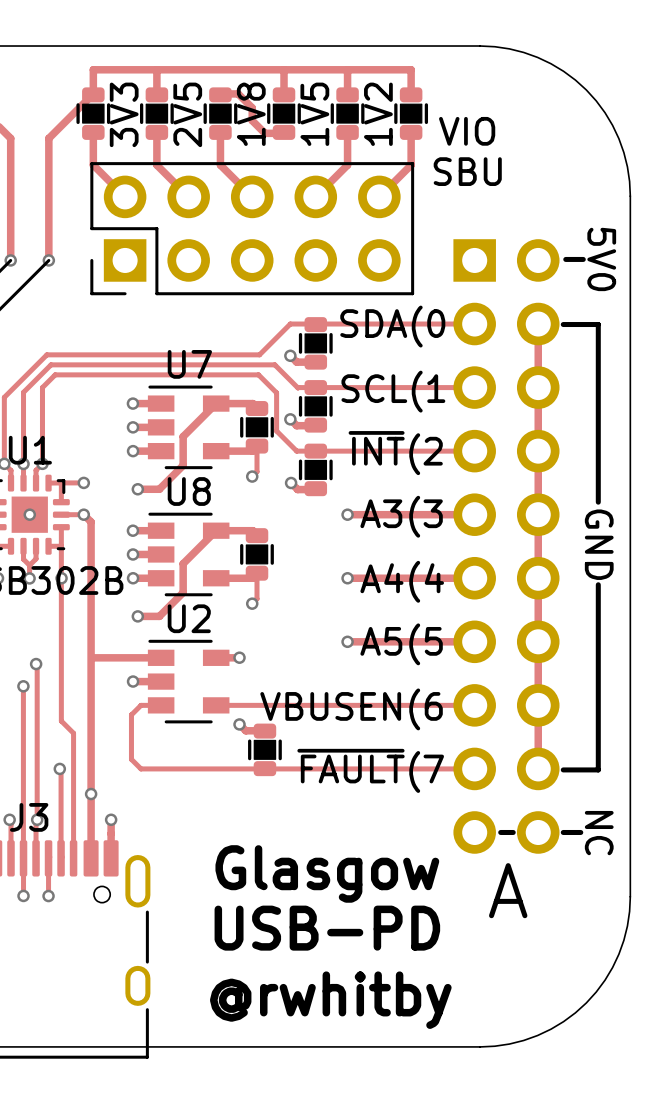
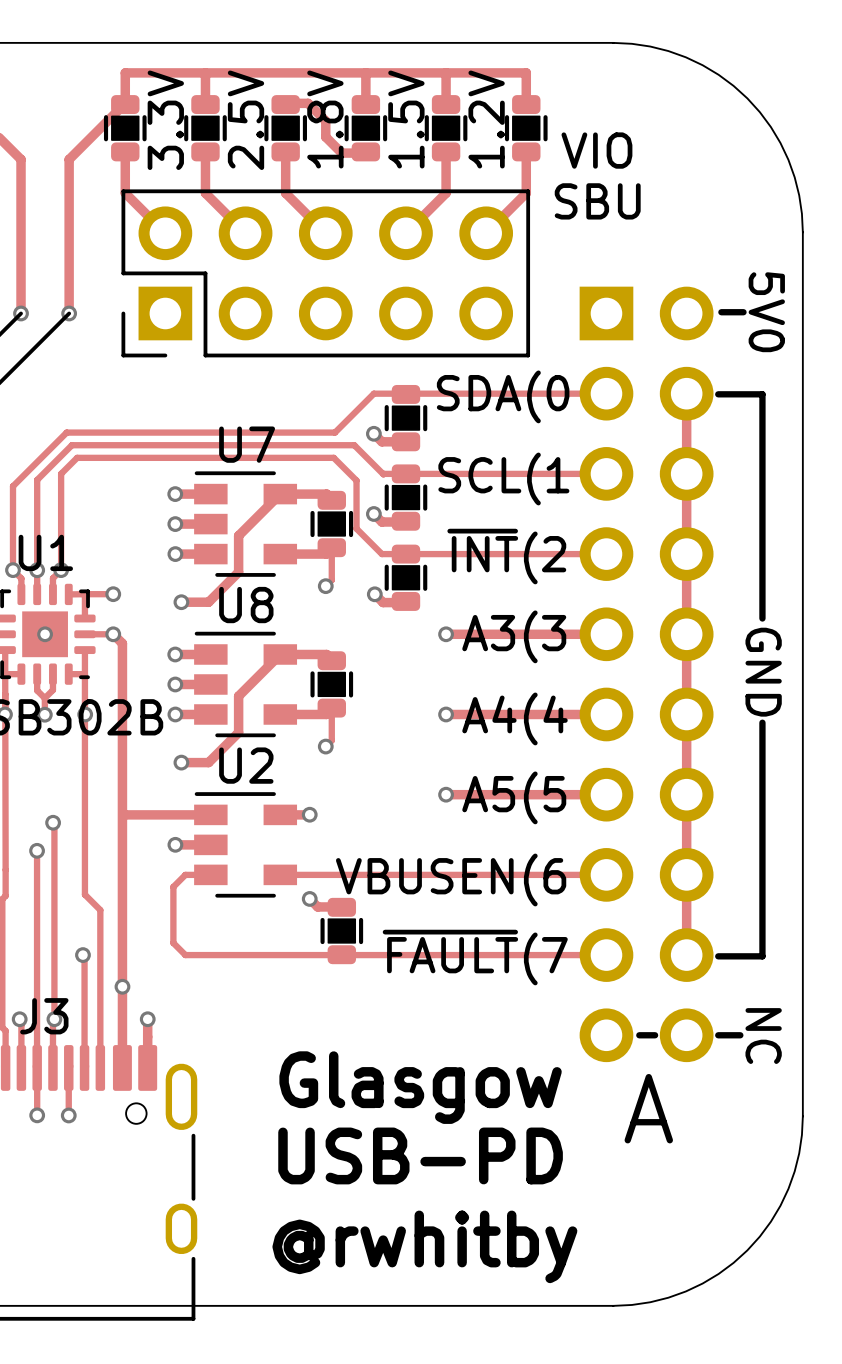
text: 3V3 (124, 114) -> 3.3V (165, 120)
text: 2V5 (187, 114) -> 2.5V (246, 120)
text: 1V8 (251, 114) -> 1.8V (325, 119)
text: 1V5 (314, 114) -> 1.5V (406, 119)
text: 1V2 (378, 114) -> 1.2V (486, 119)

